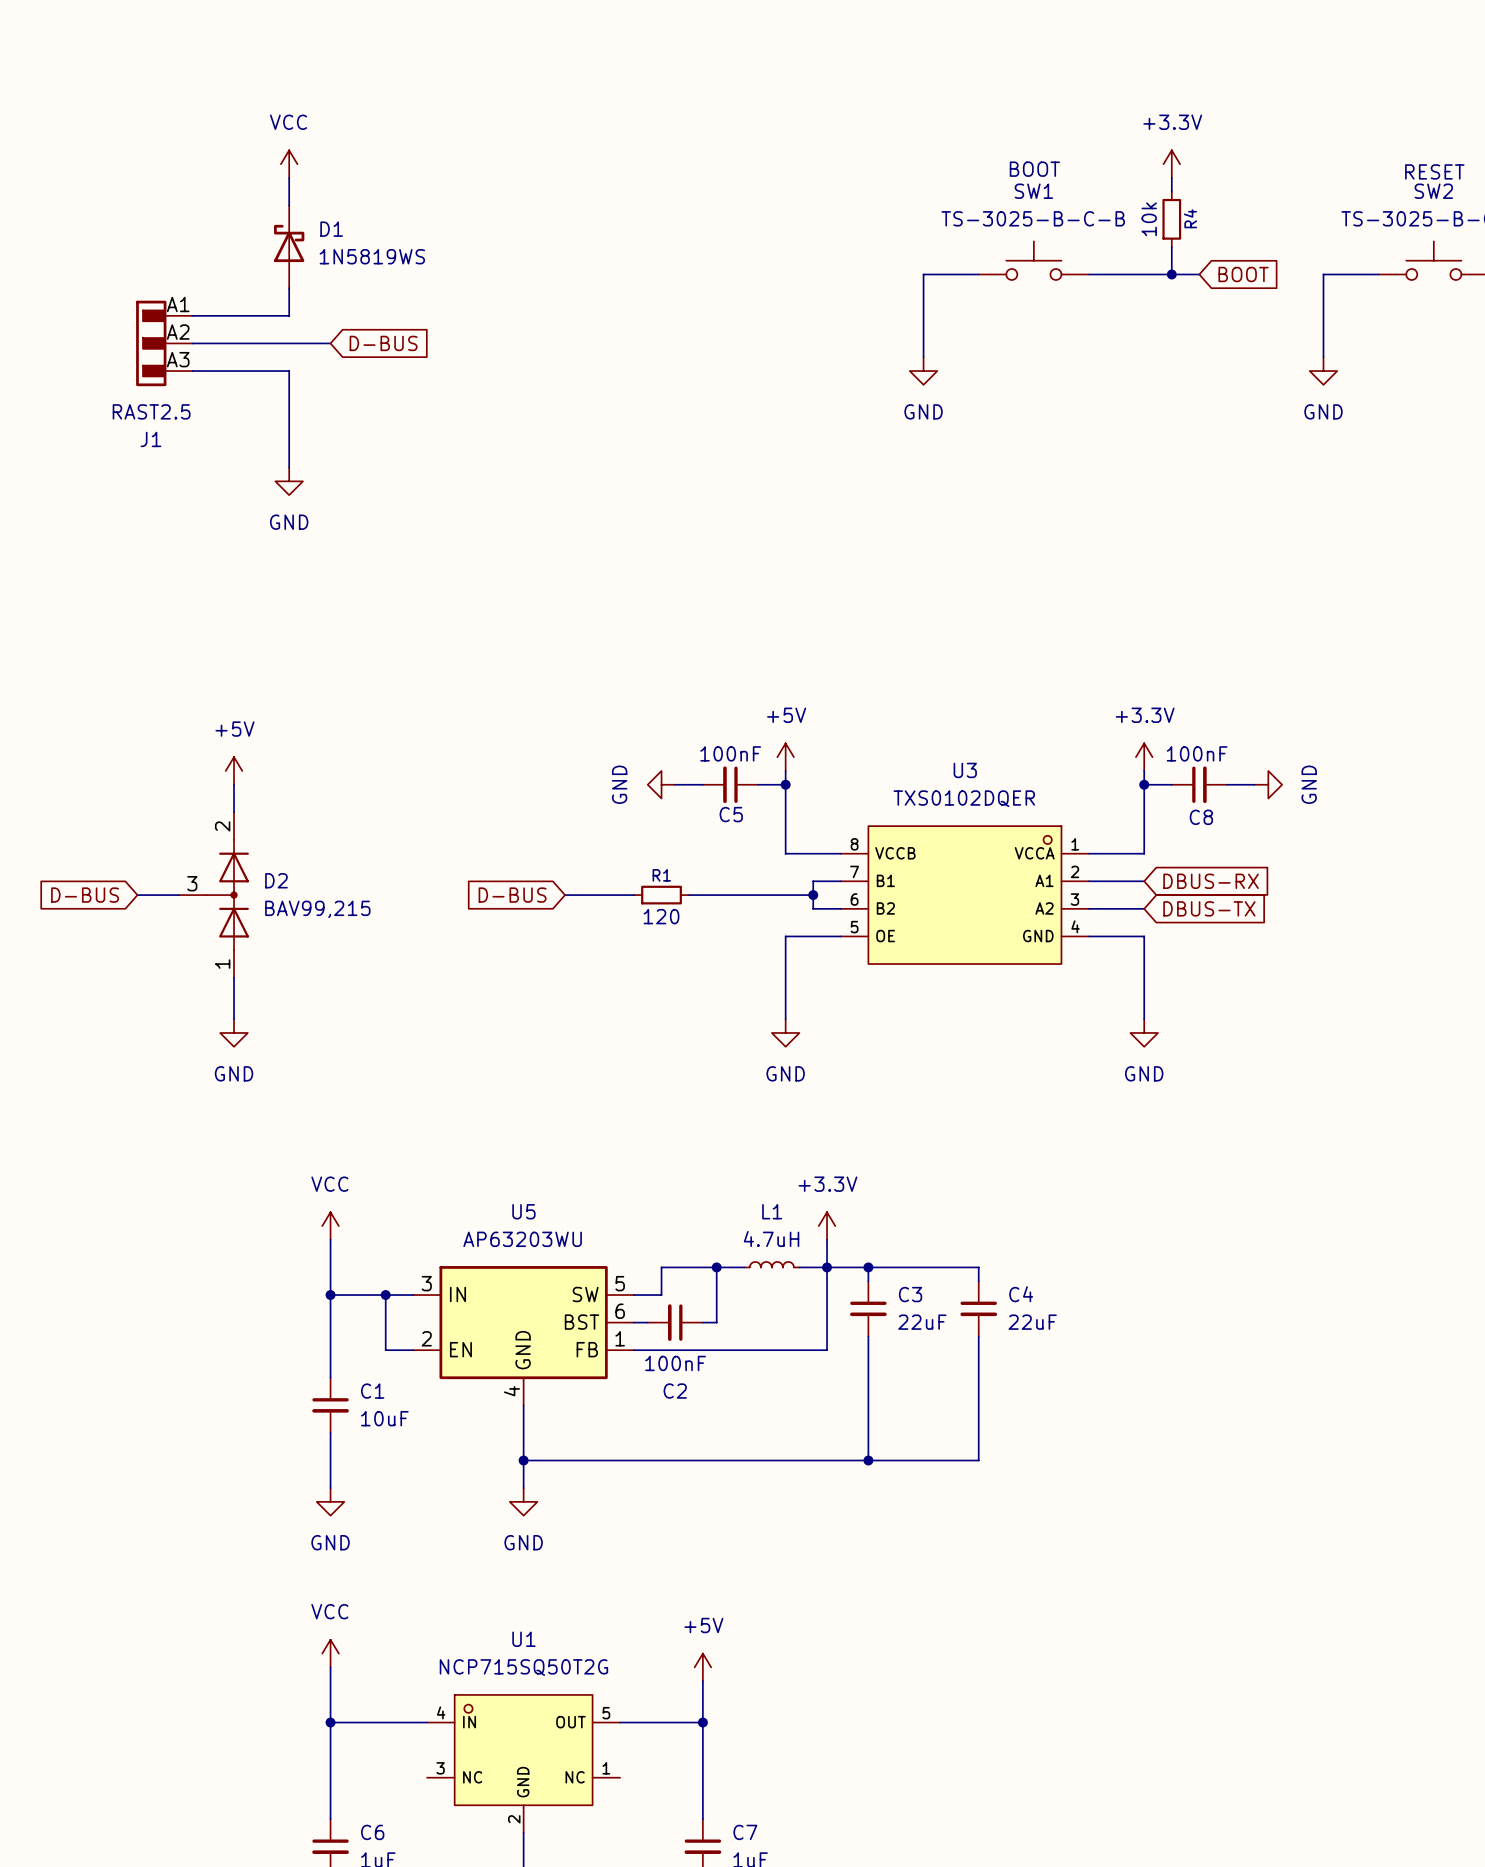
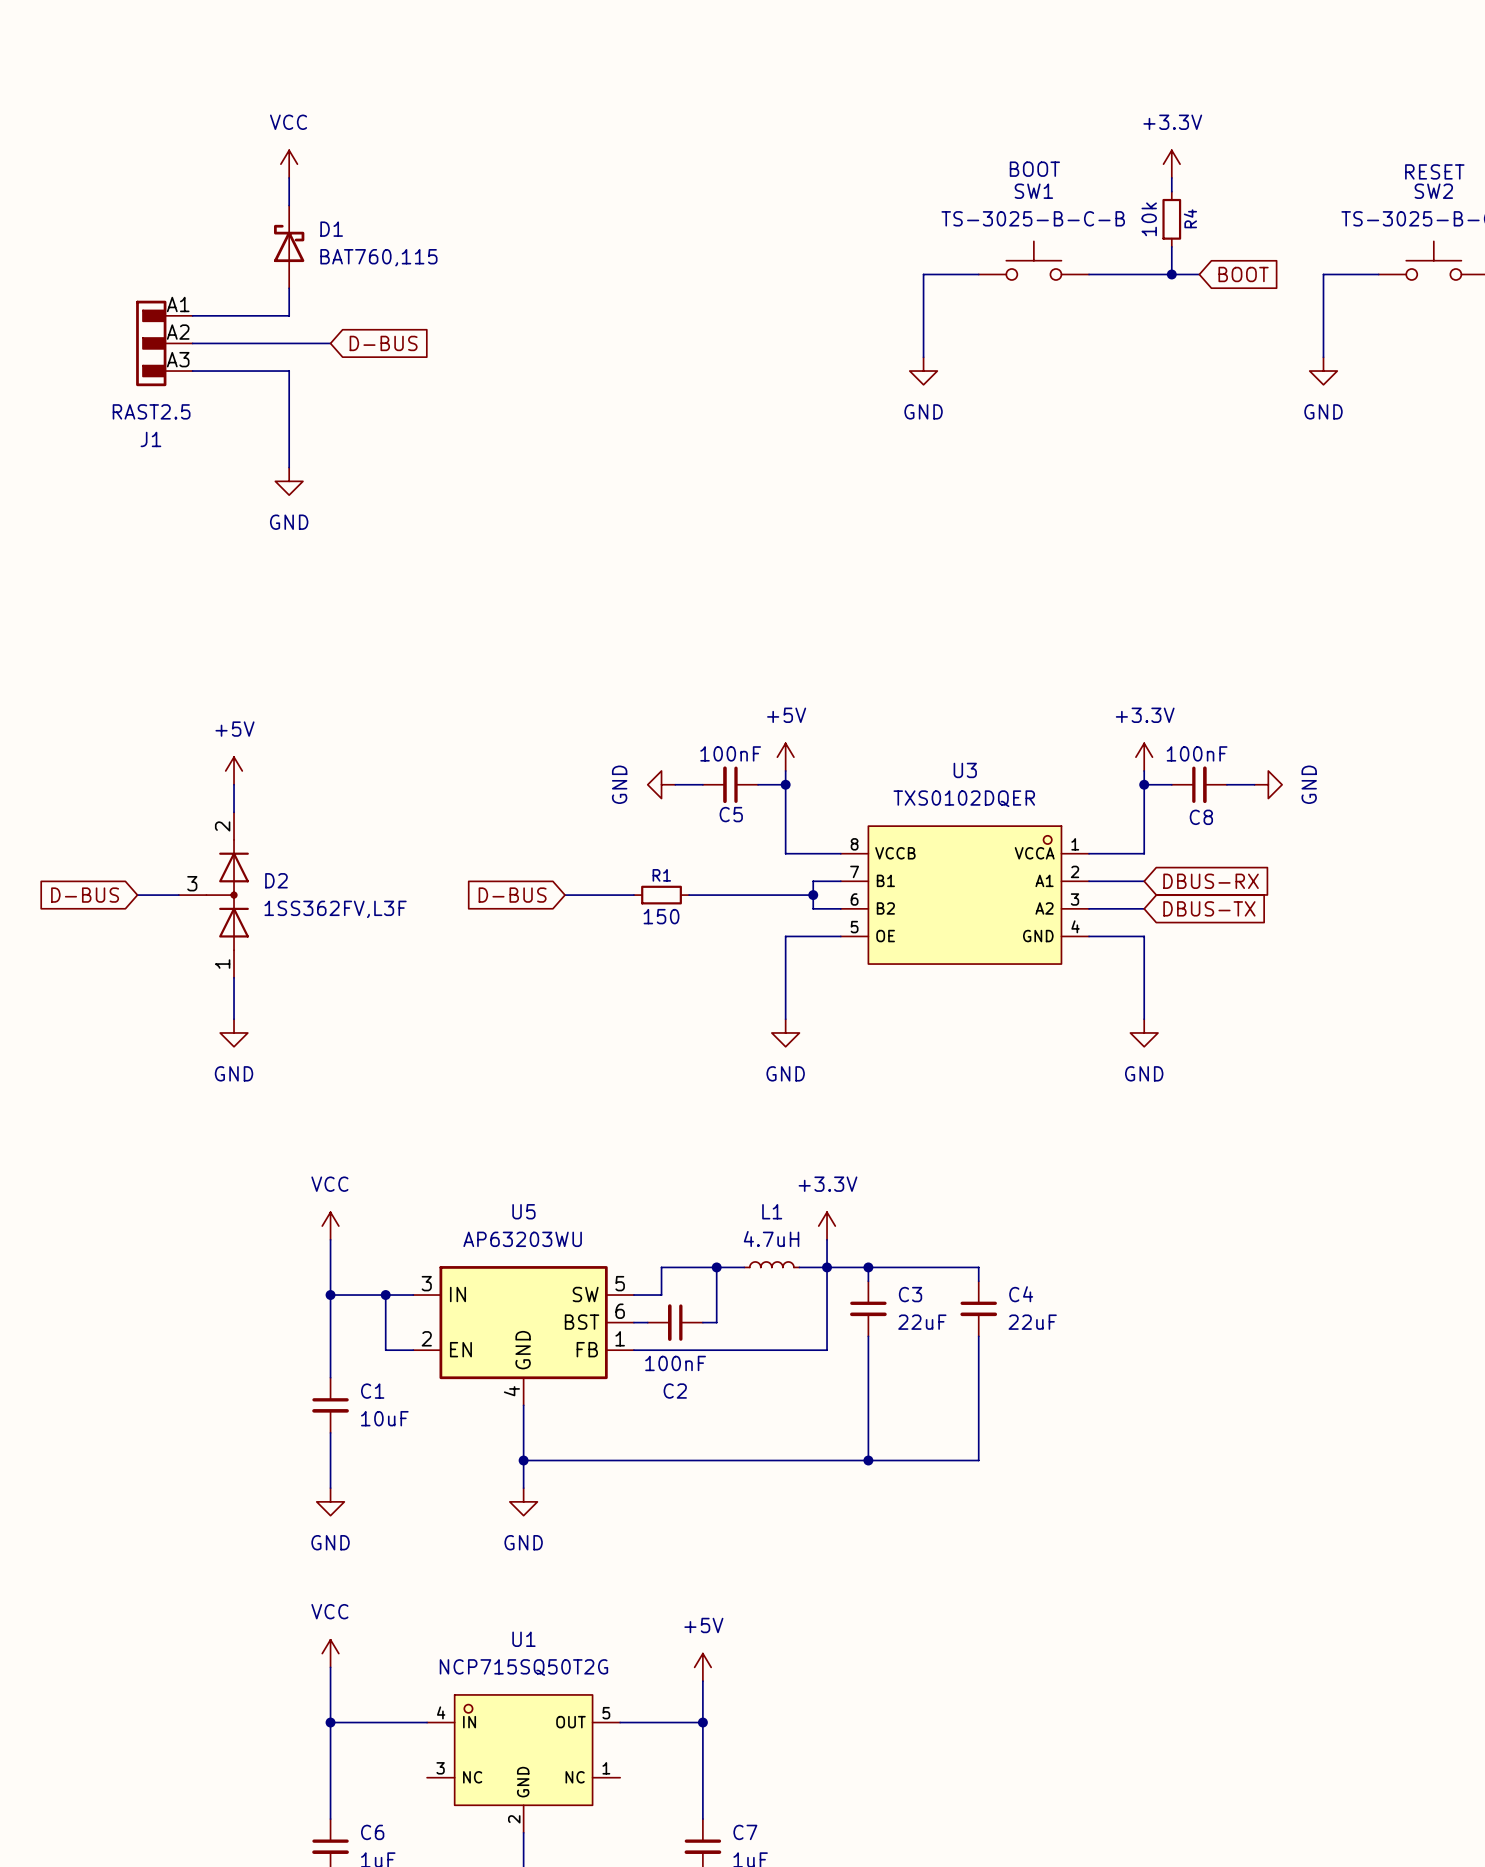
D1 value: 1N5819WS (372, 256) -> BAT760,115 (378, 257)
D2 value: BAV99,215 (317, 909) -> 1SS362FV,L3F (335, 909)
R1 value: 120 (661, 916) -> 150 (661, 916)

